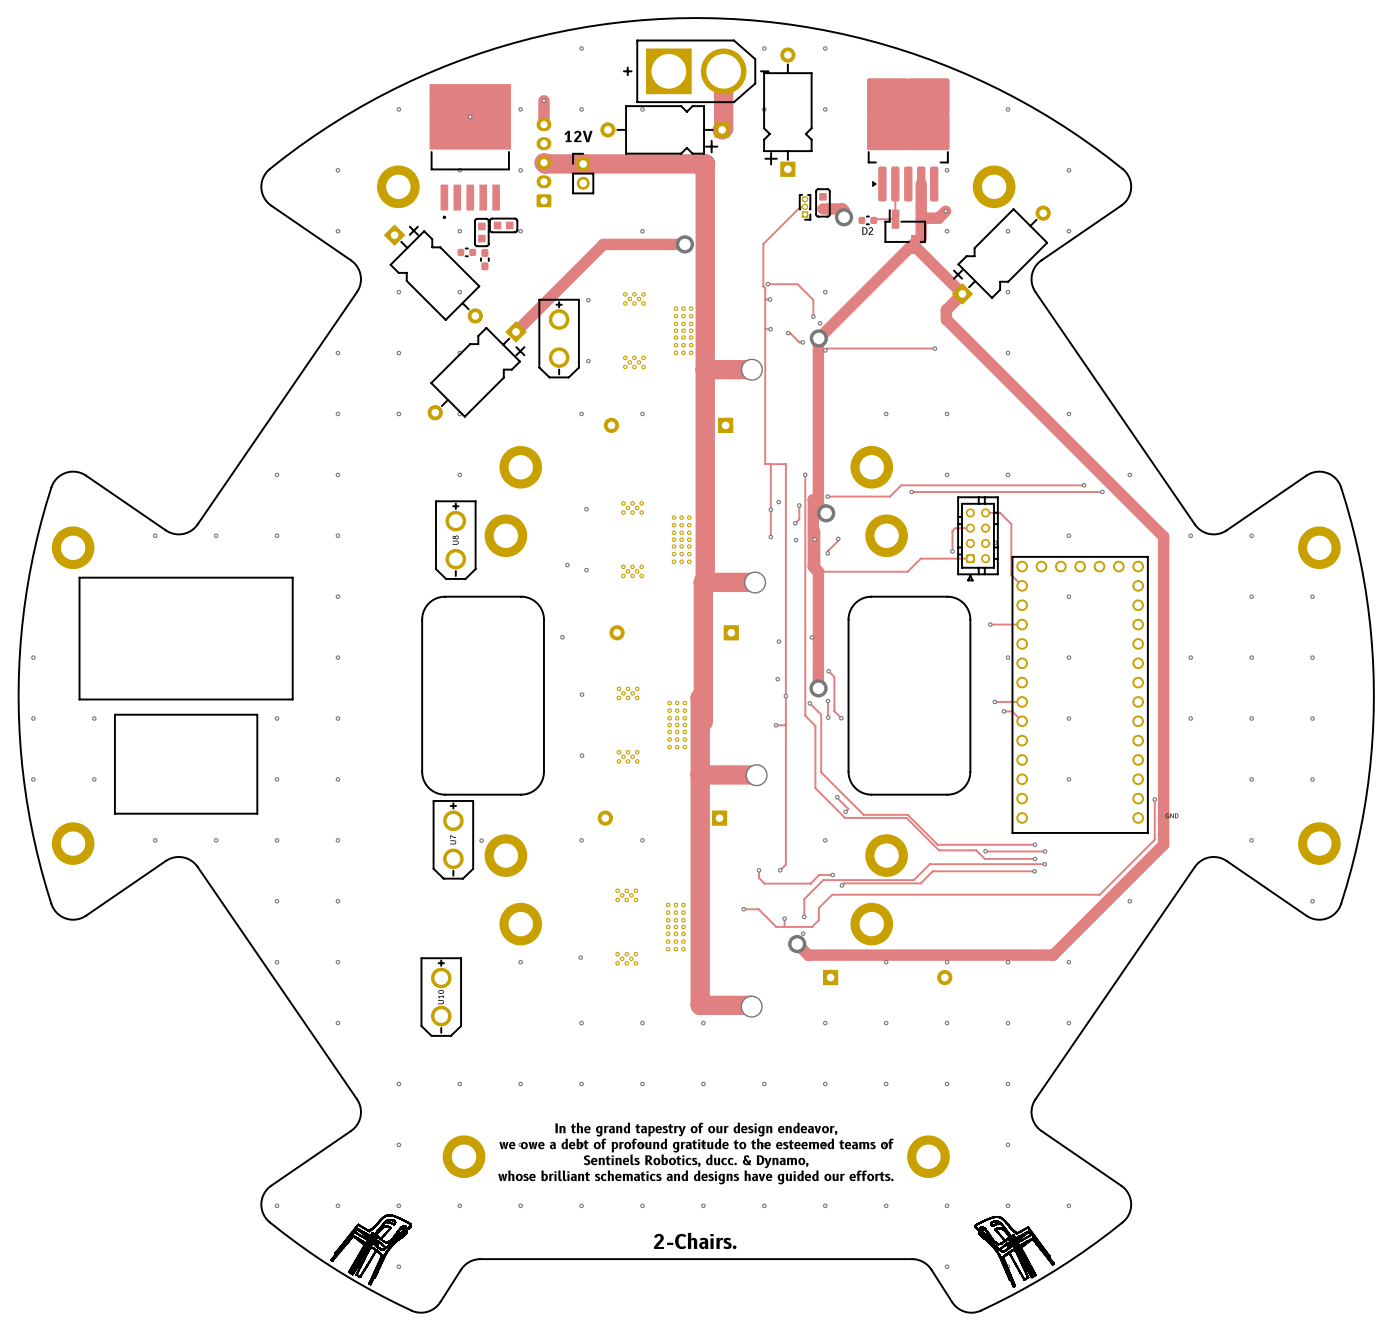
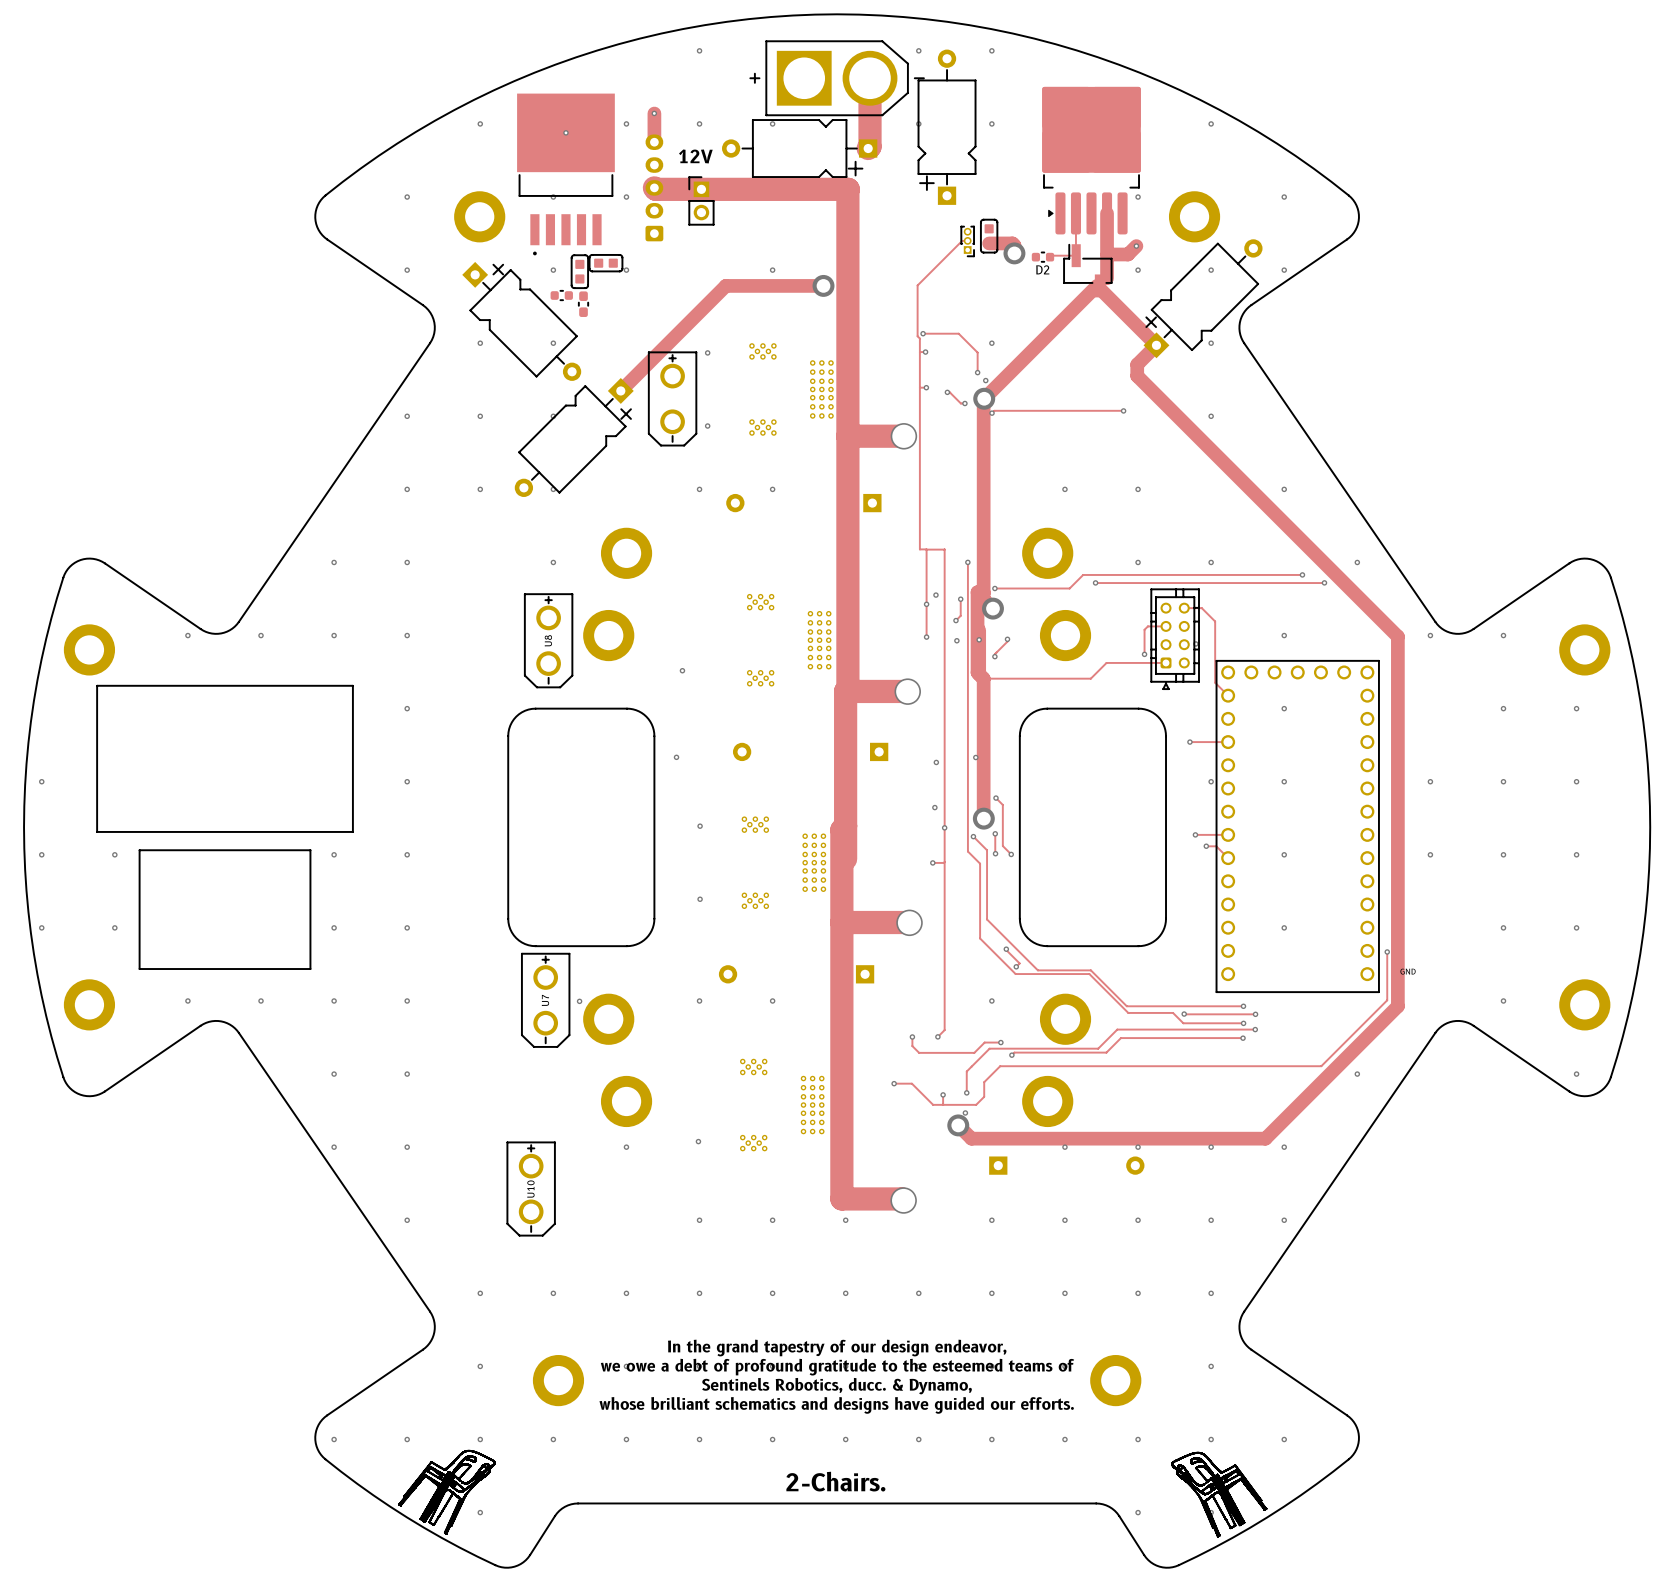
via: (586, 509) -> none
via: (586, 570) -> none

